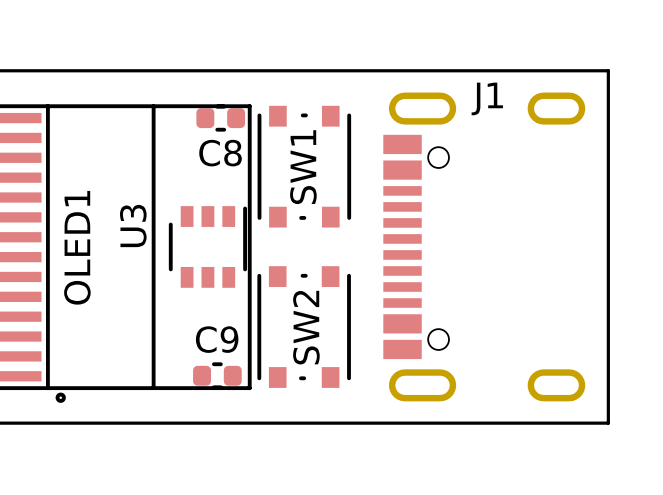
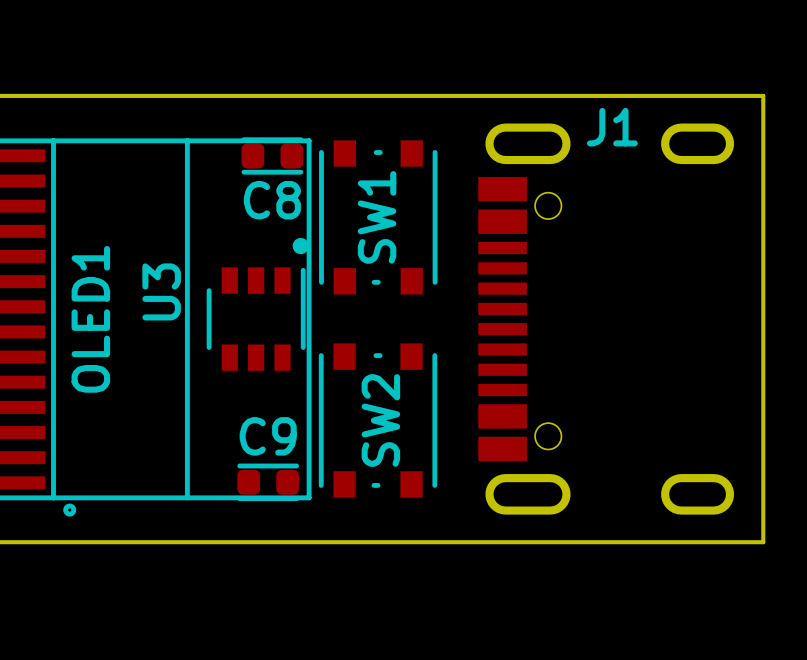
C8 footprint: [196, 104, 246, 132] -> [241, 137, 304, 175]
drawing: none -> [292, 237, 309, 255]
C9 footprint: [193, 362, 242, 390] -> [237, 463, 299, 501]

